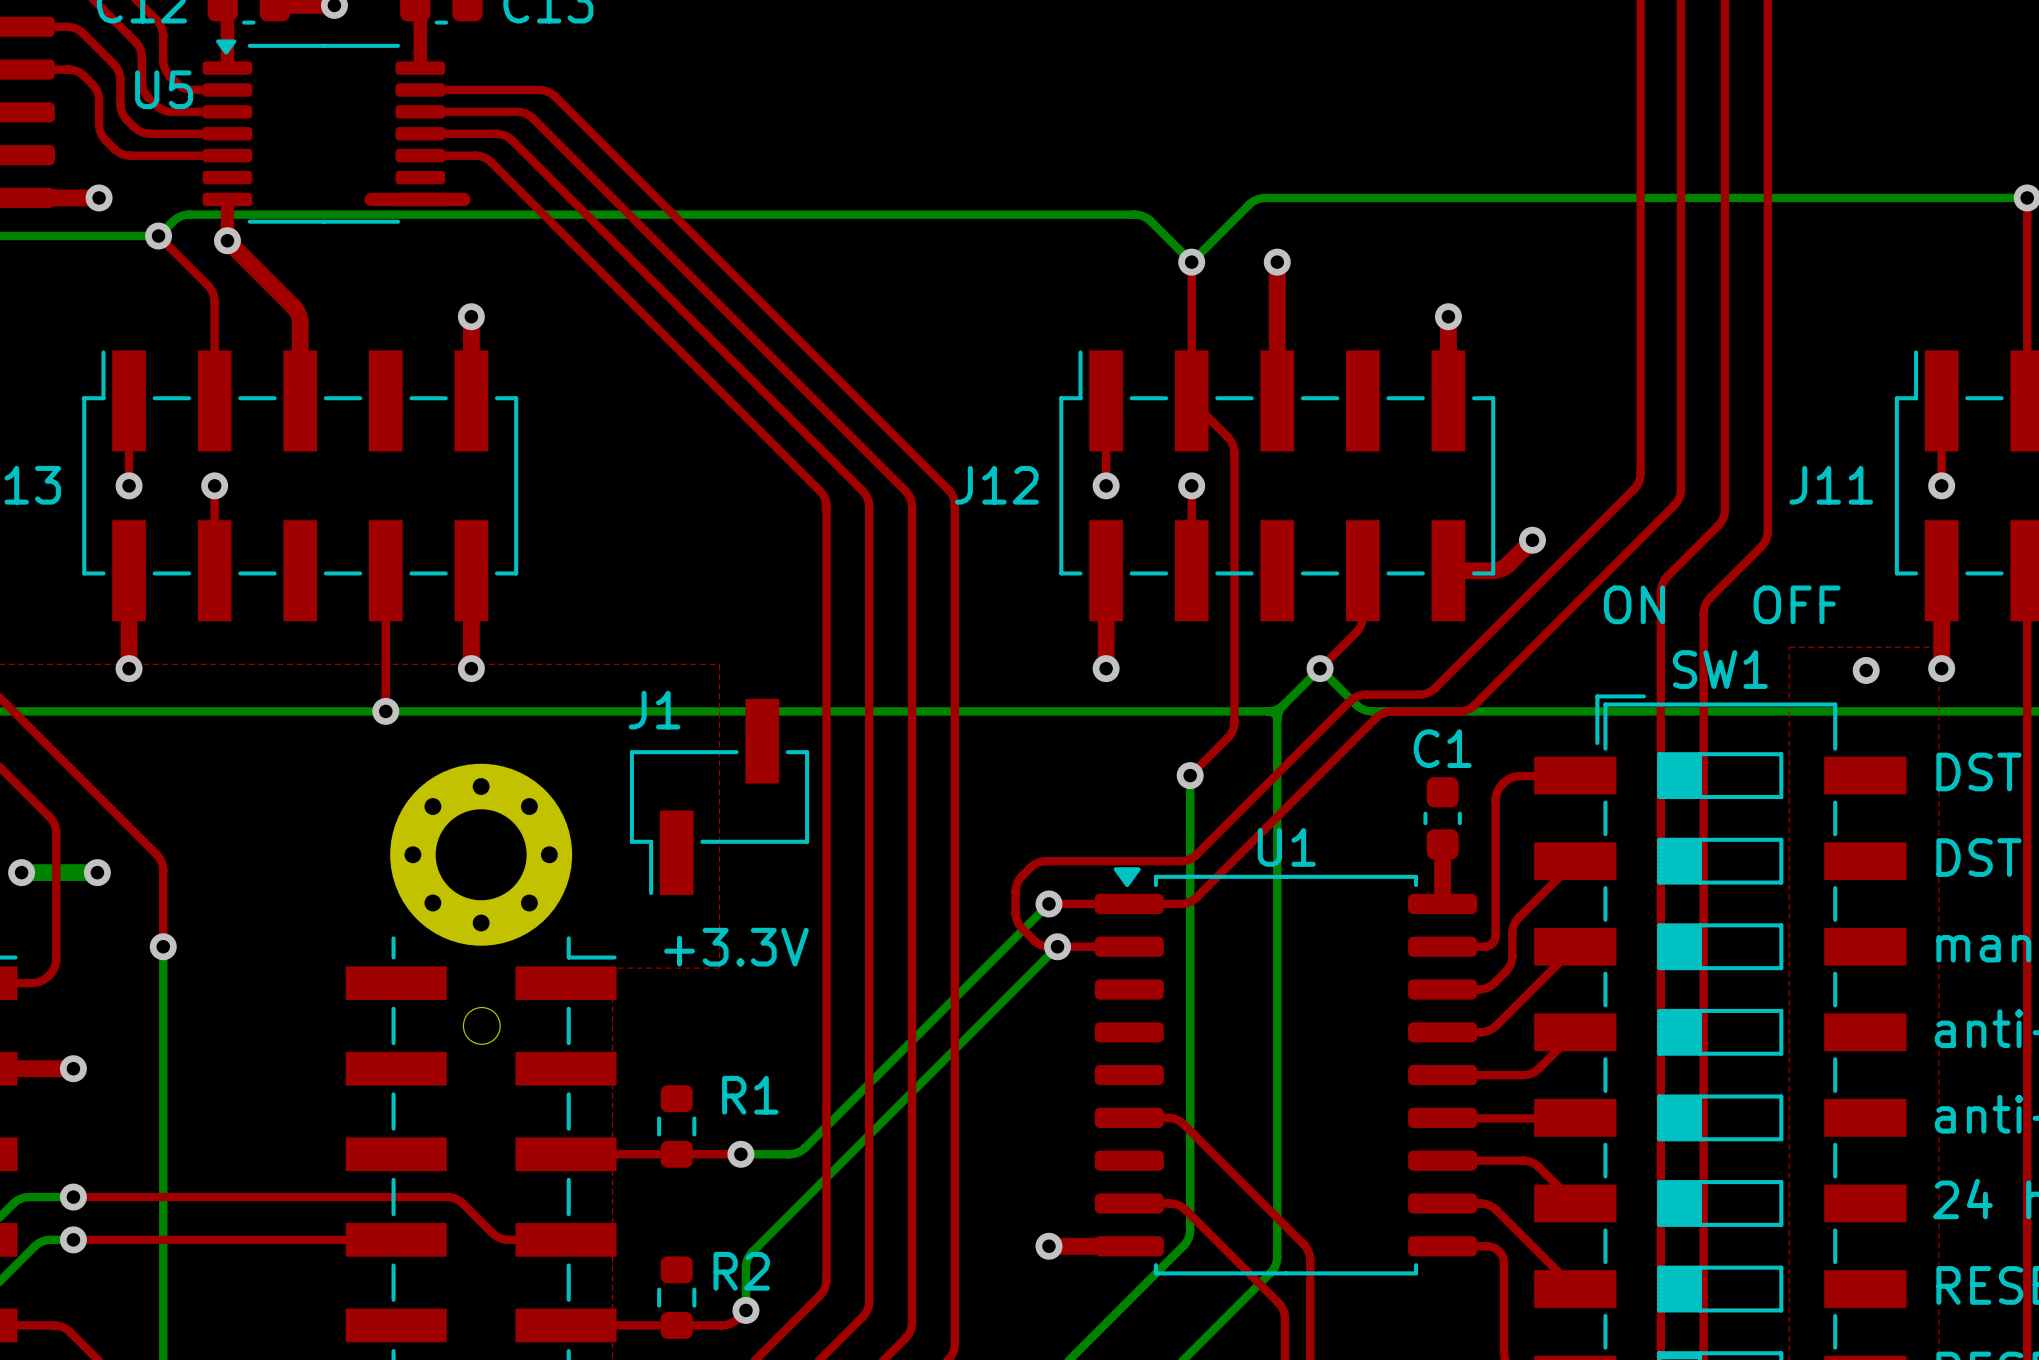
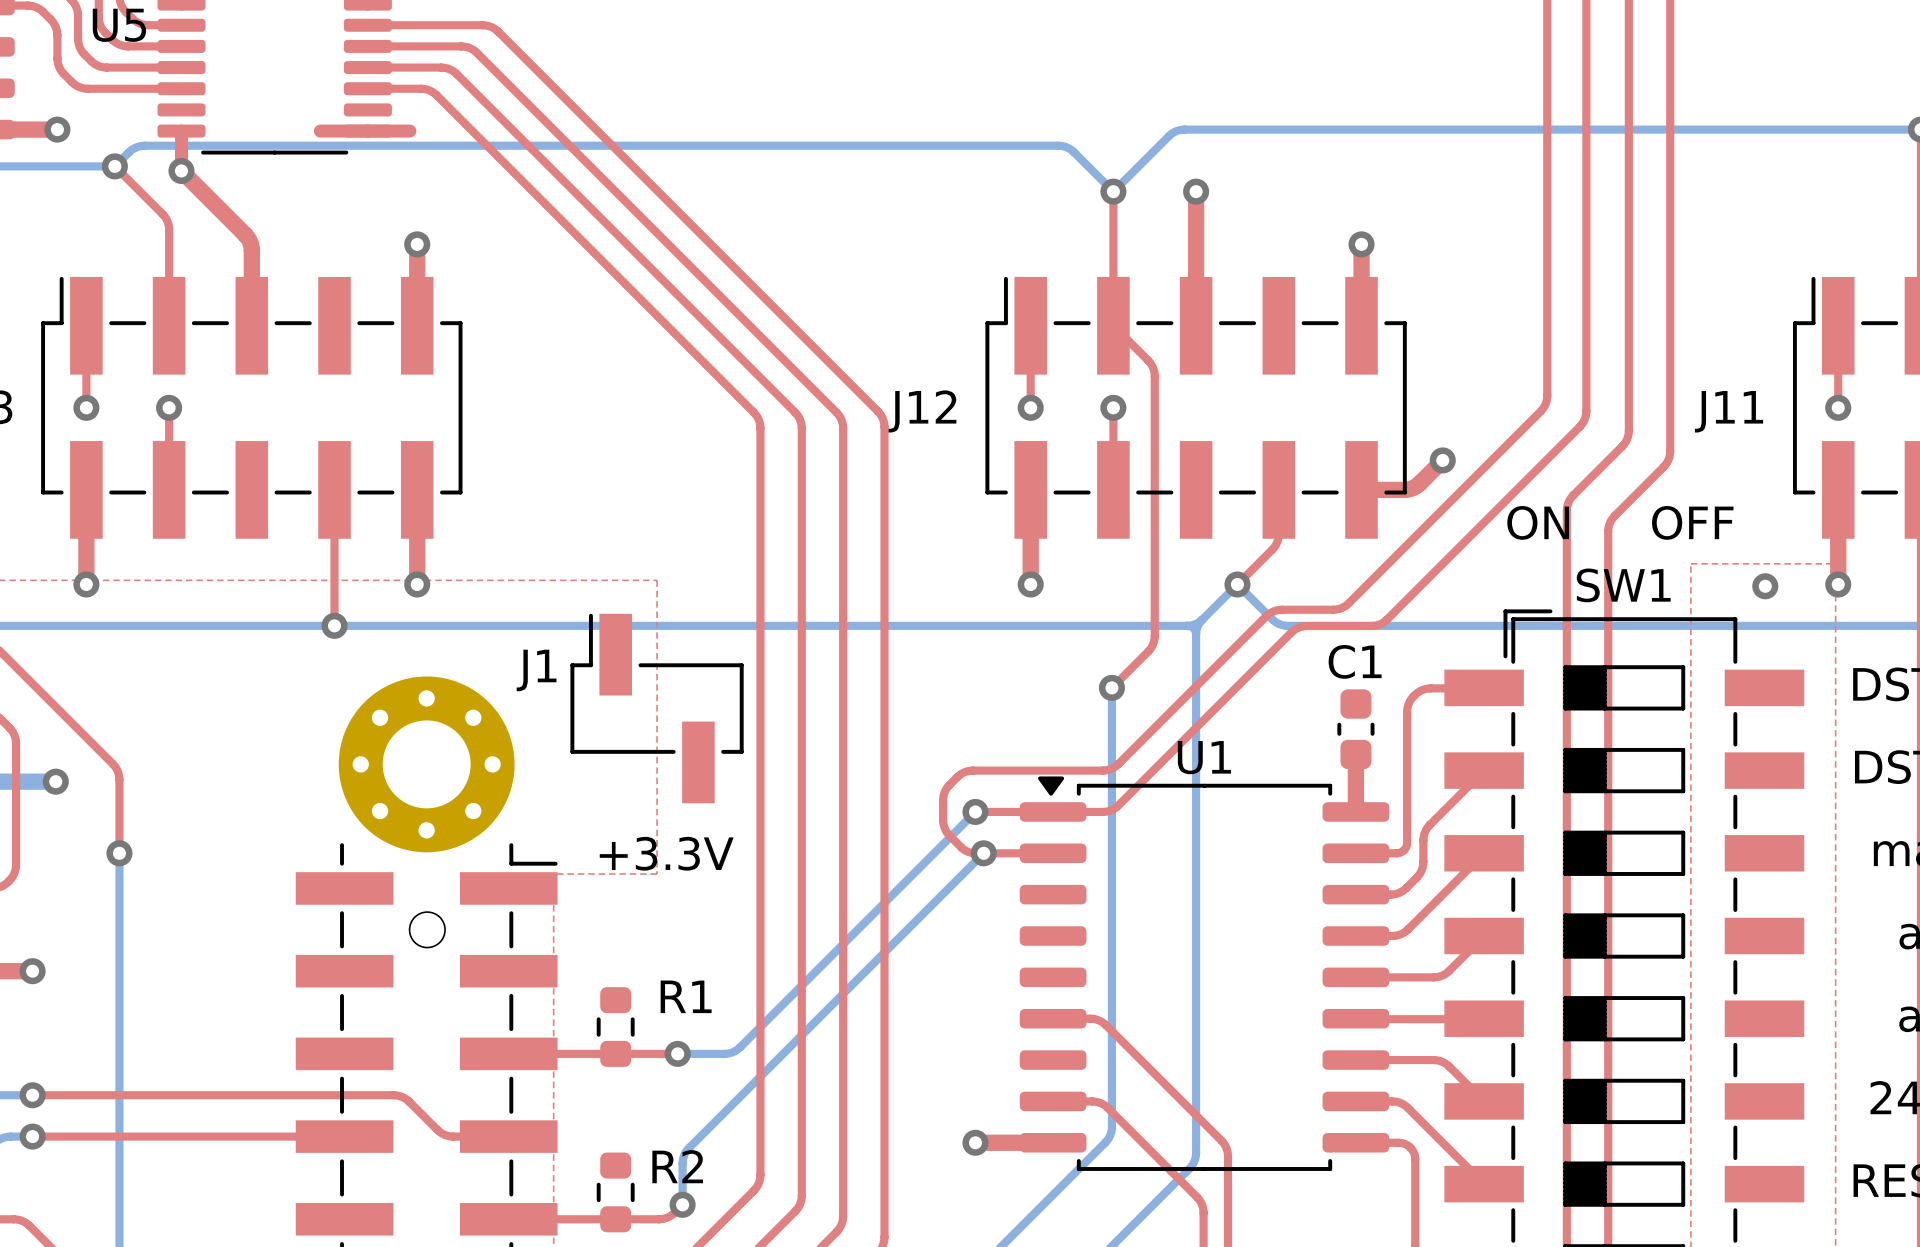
J1 footprint: [629, 698, 810, 896] -> [570, 613, 744, 804]
J1 name position: J1 (654, 710) -> J1 (536, 670)

